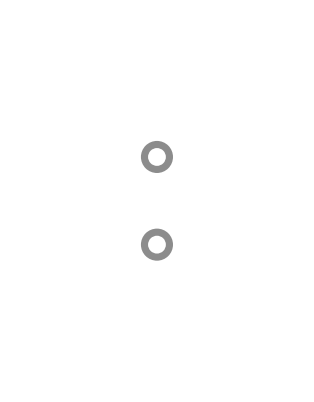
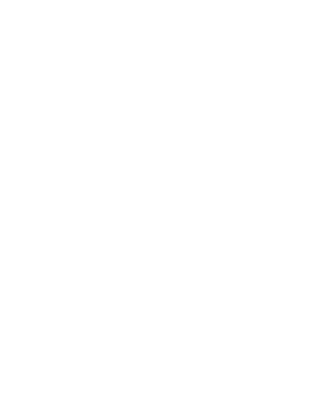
via: (156, 156) -> none
via: (156, 244) -> none

